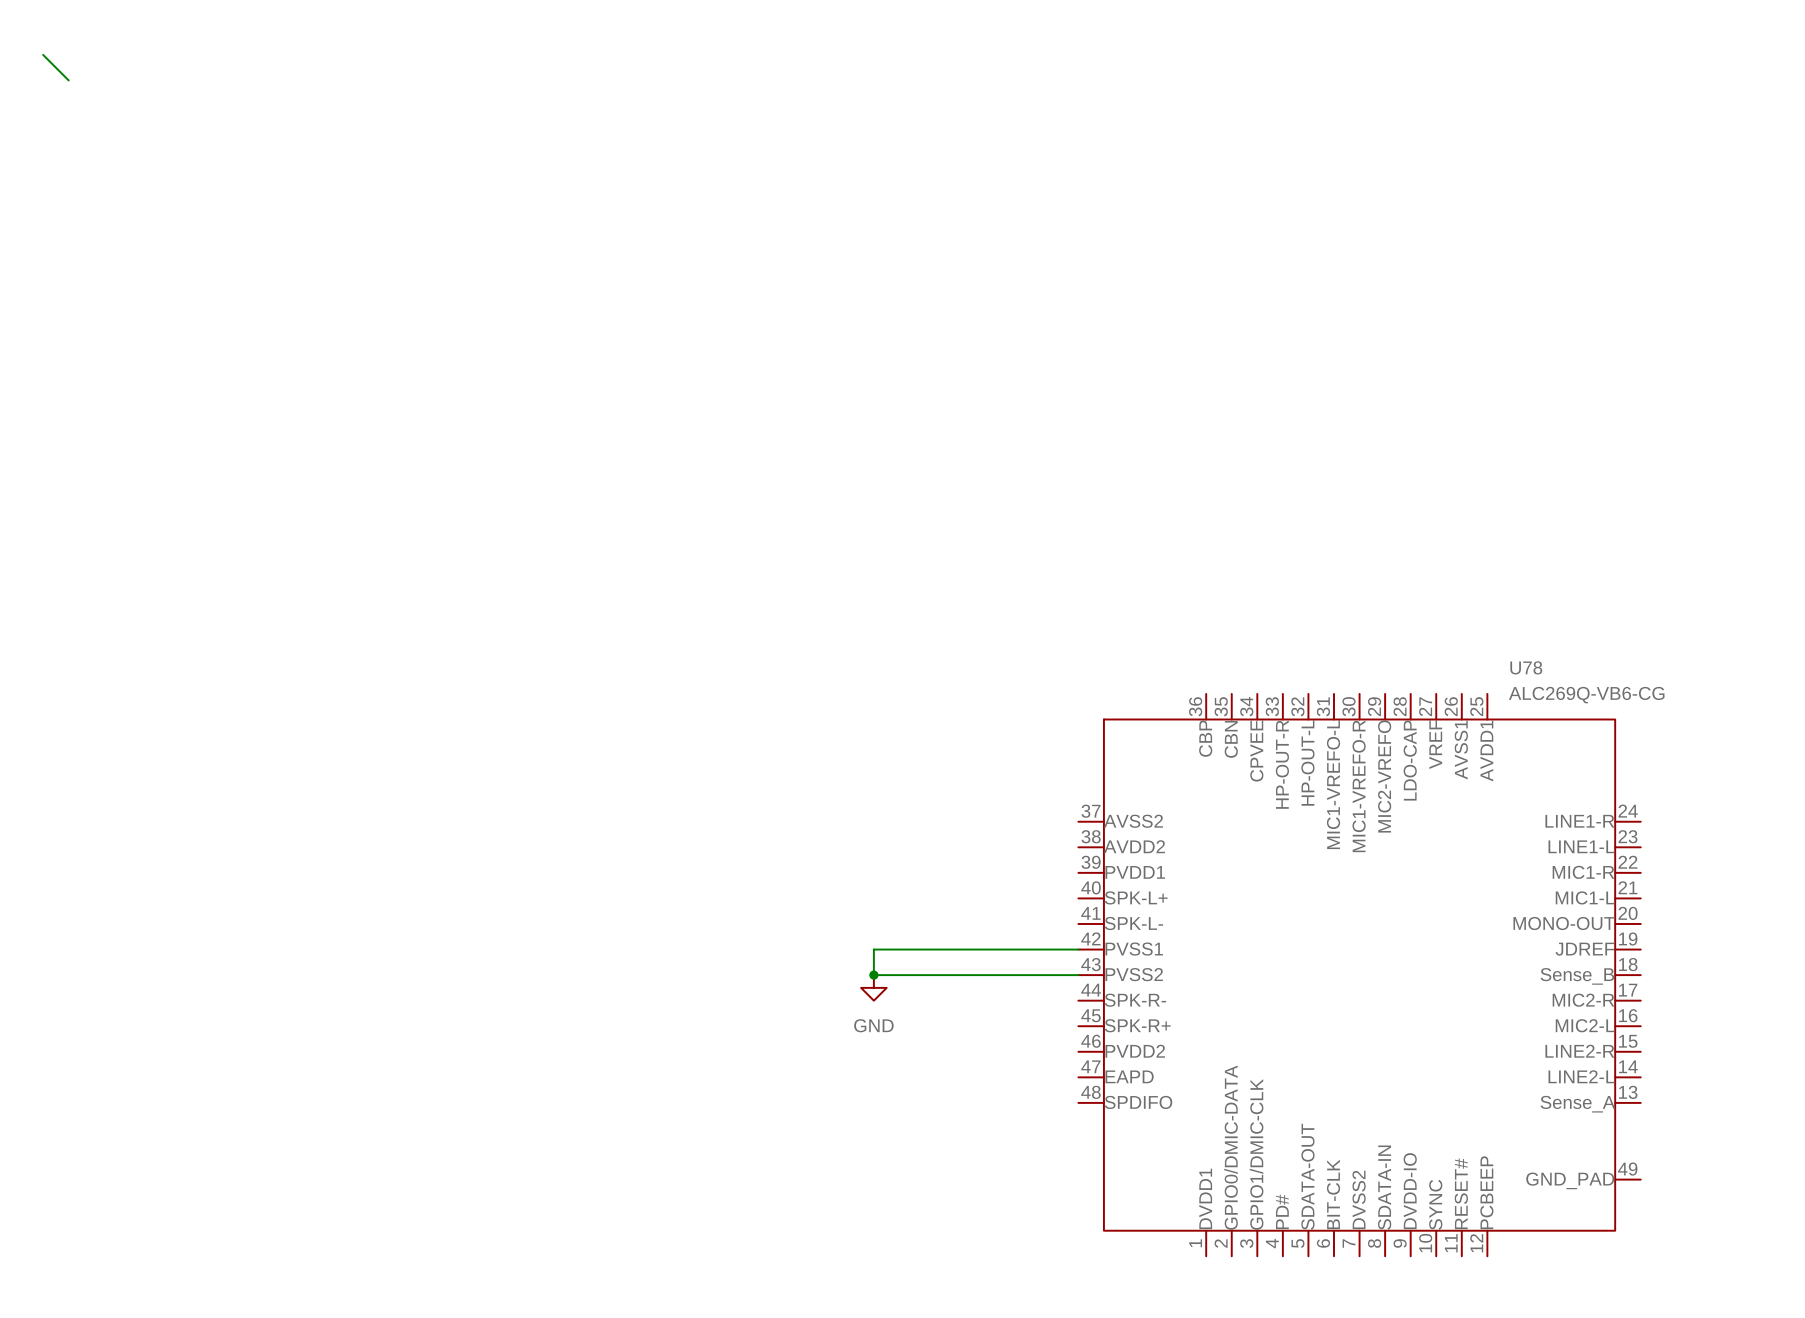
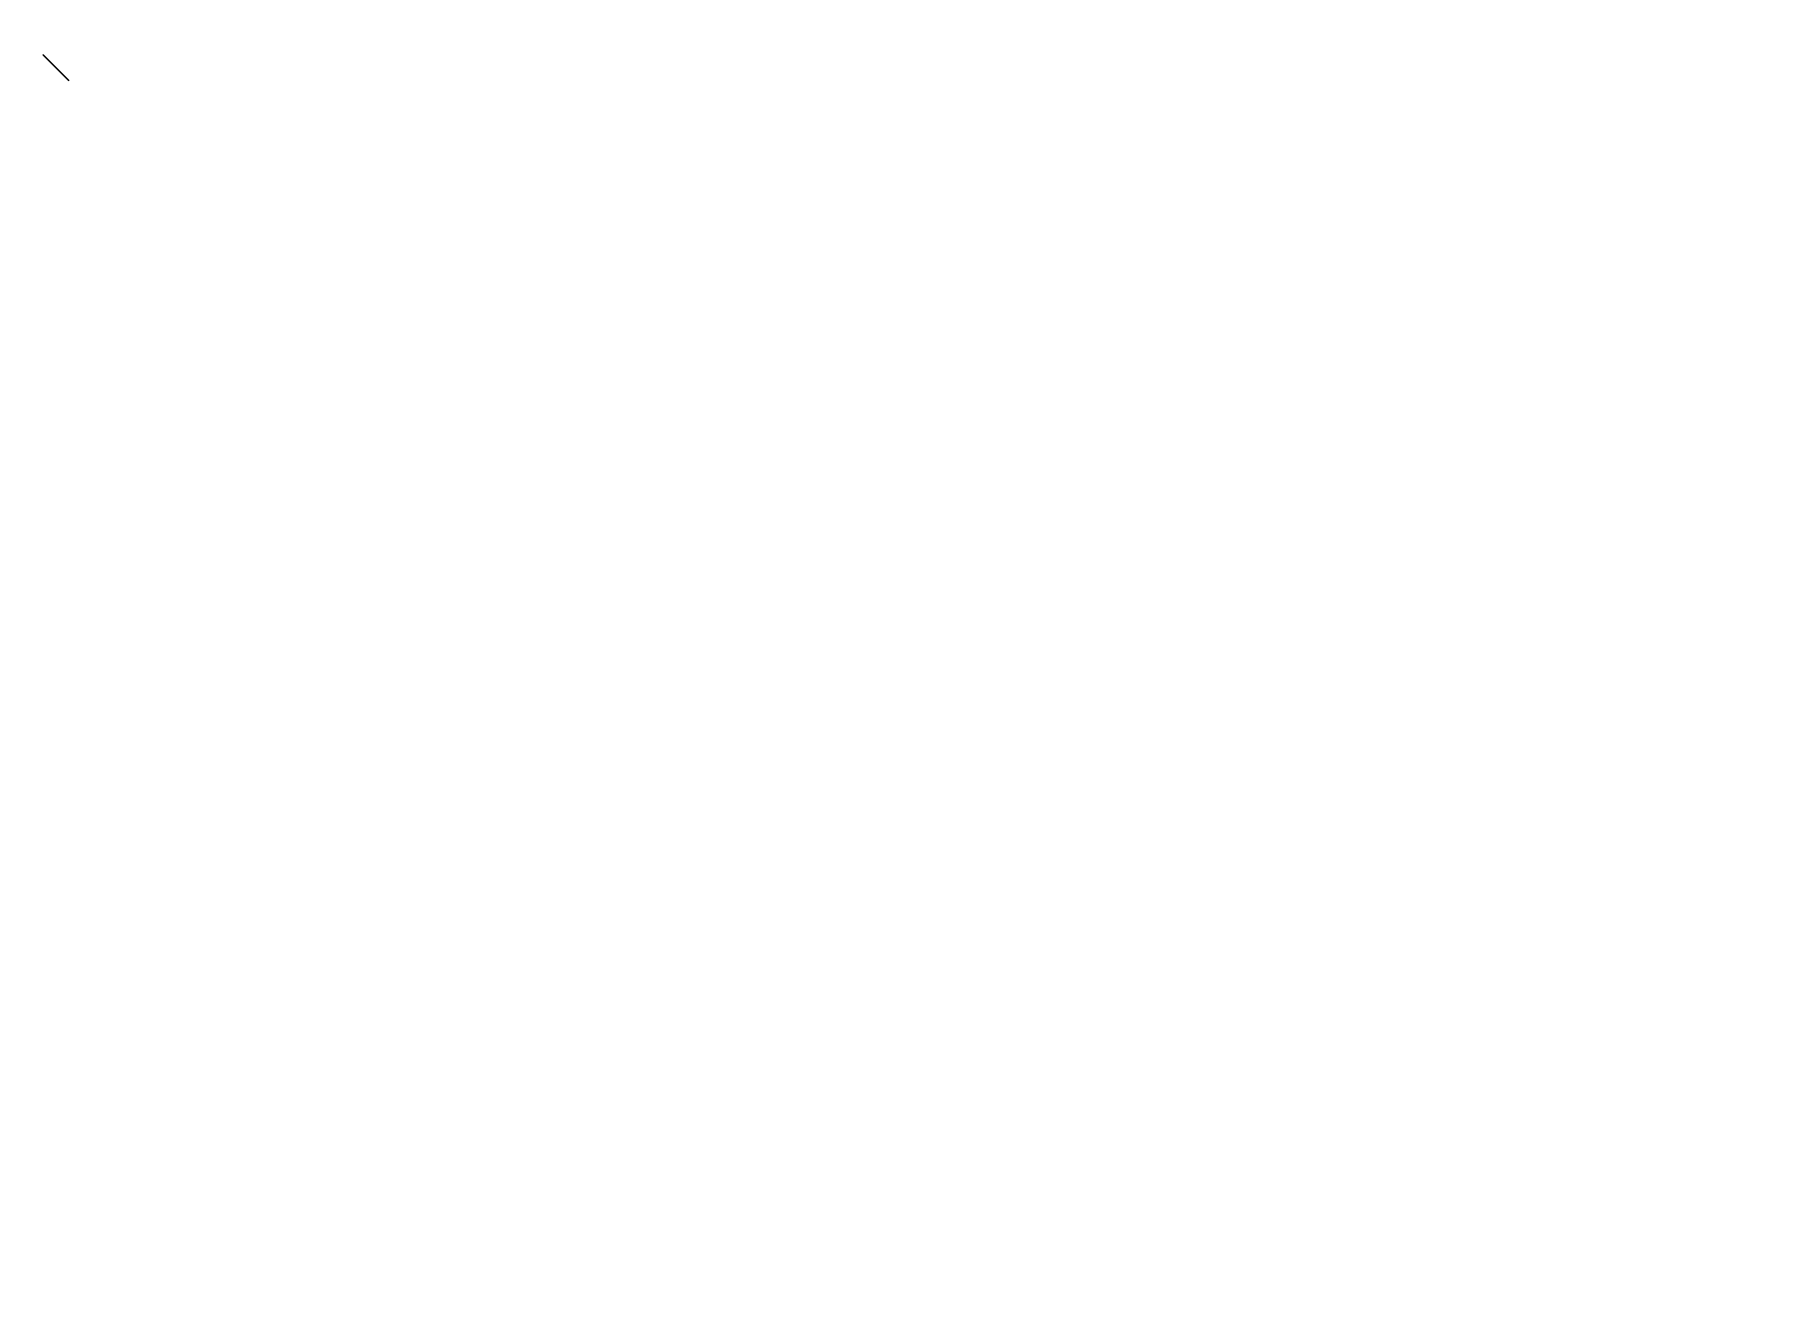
wire: (1078, 949) (873, 949) (873, 975) (1078, 975) -> none
junction: (873, 975) -> none
U78: ALC269Q-VB6-CG (1359, 975) -> none
power symbol: GND (873, 987) -> none

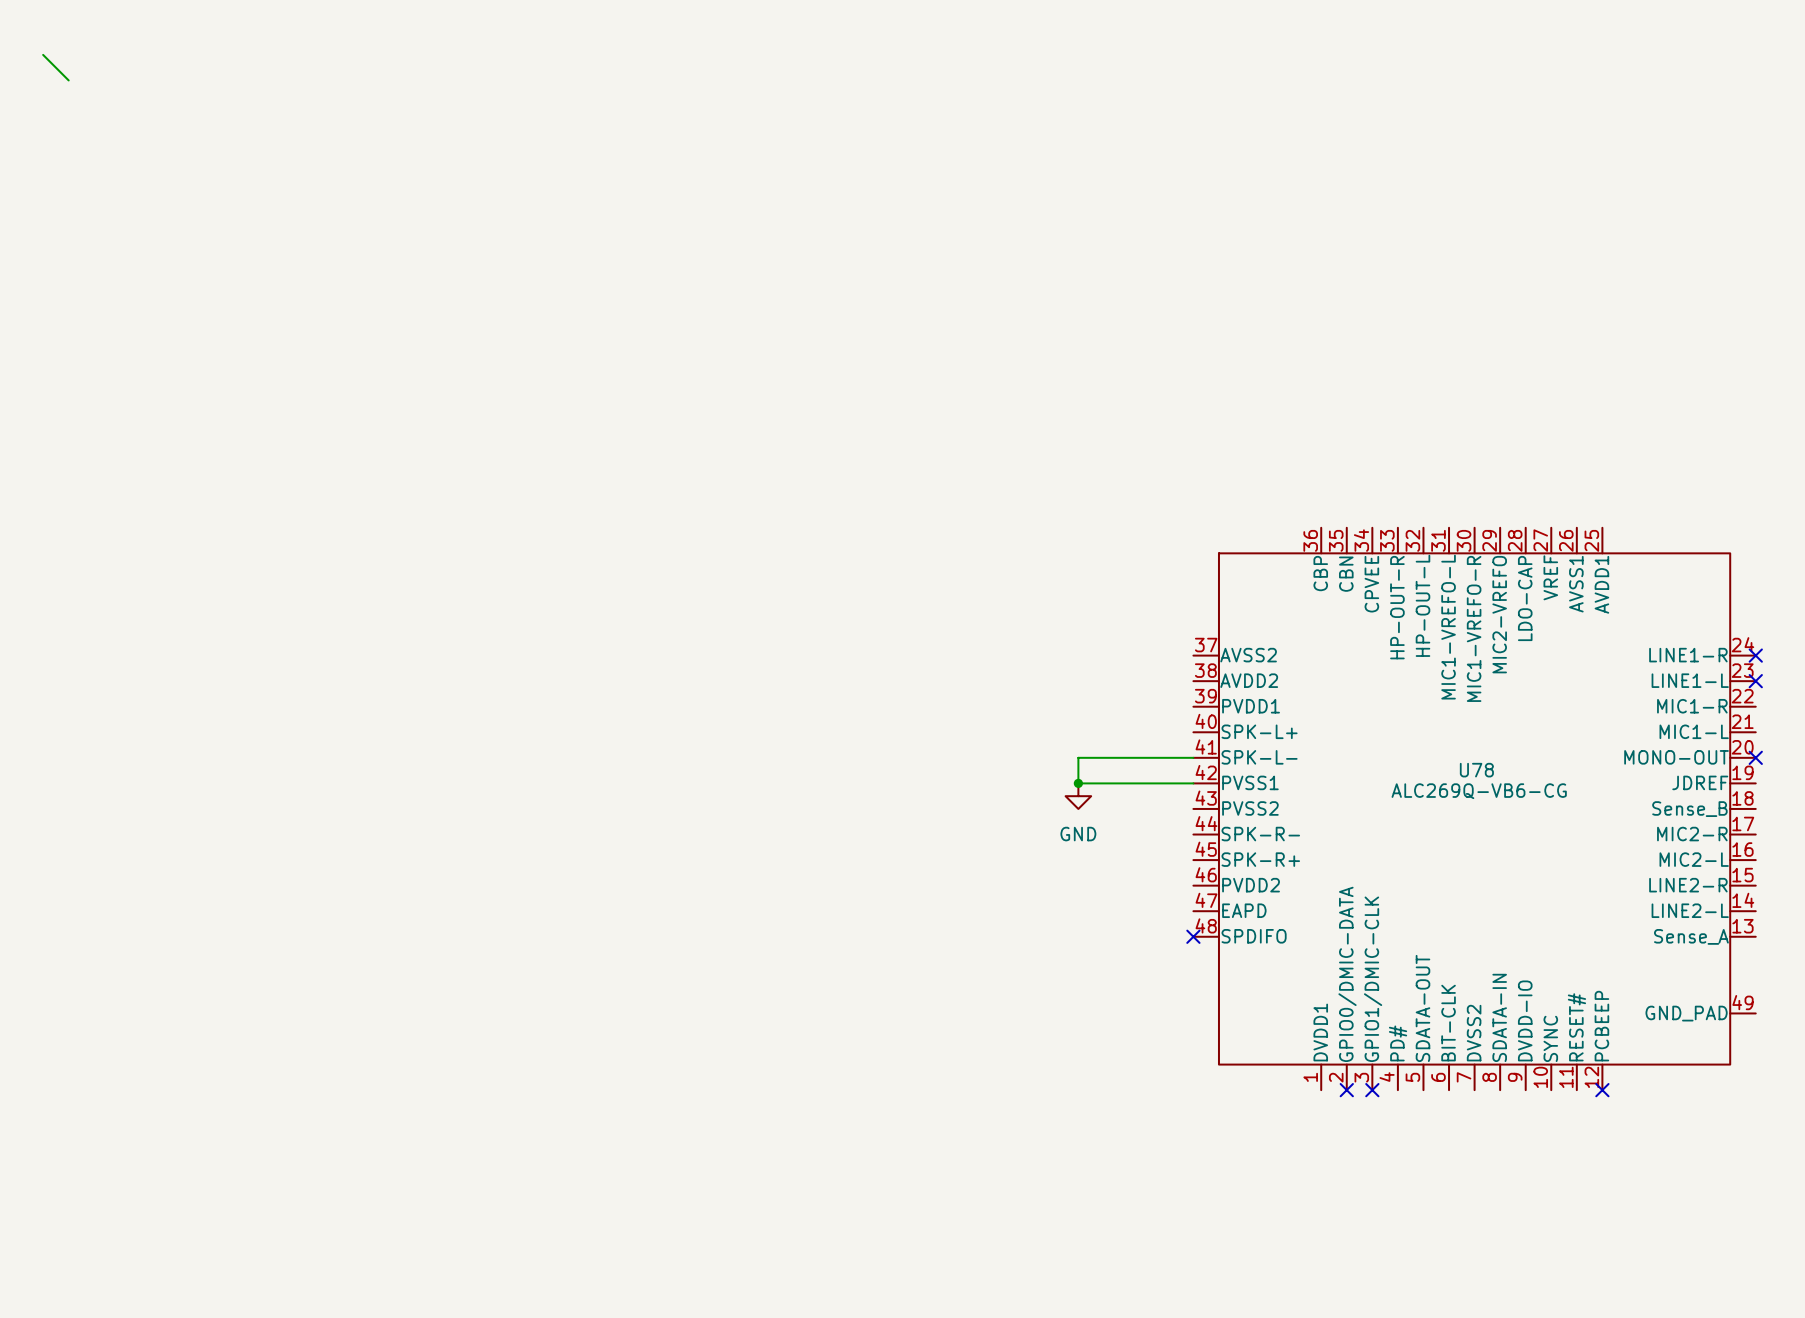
no-connect mark: none -> (1755, 655)
no-connect mark: none -> (1755, 681)
wire: none -> (1193, 757) (1078, 757) (1078, 783) (1193, 783)
no-connect mark: none -> (1755, 757)
junction: none -> (1078, 783)
power symbol: none -> GND (1078, 796)
U78: none -> ALC269Q-VB6-CG (1474, 808)
no-connect mark: none -> (1193, 936)
no-connect mark: none -> (1346, 1090)
no-connect mark: none -> (1372, 1090)
no-connect mark: none -> (1602, 1090)

